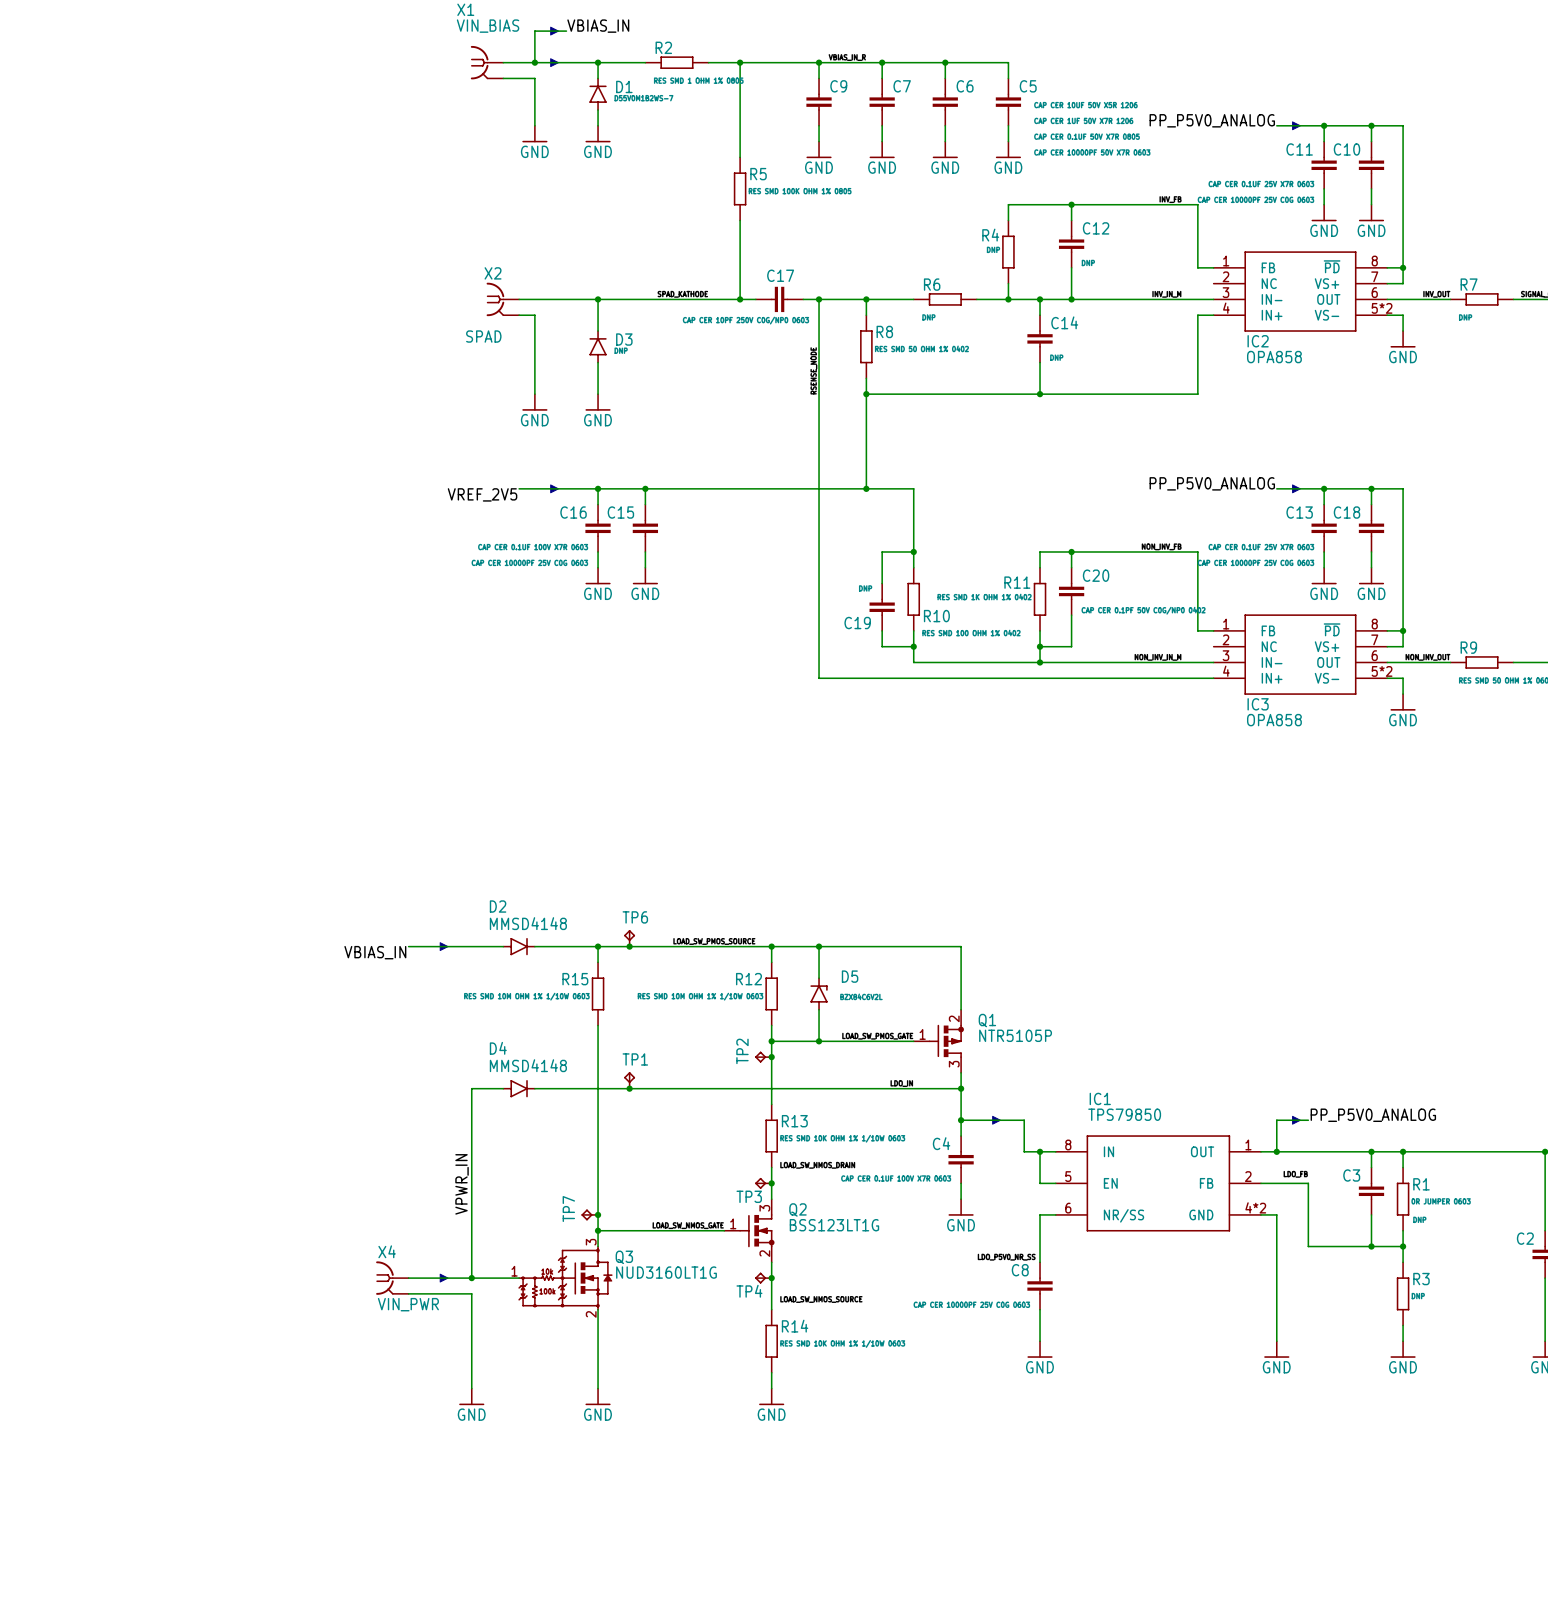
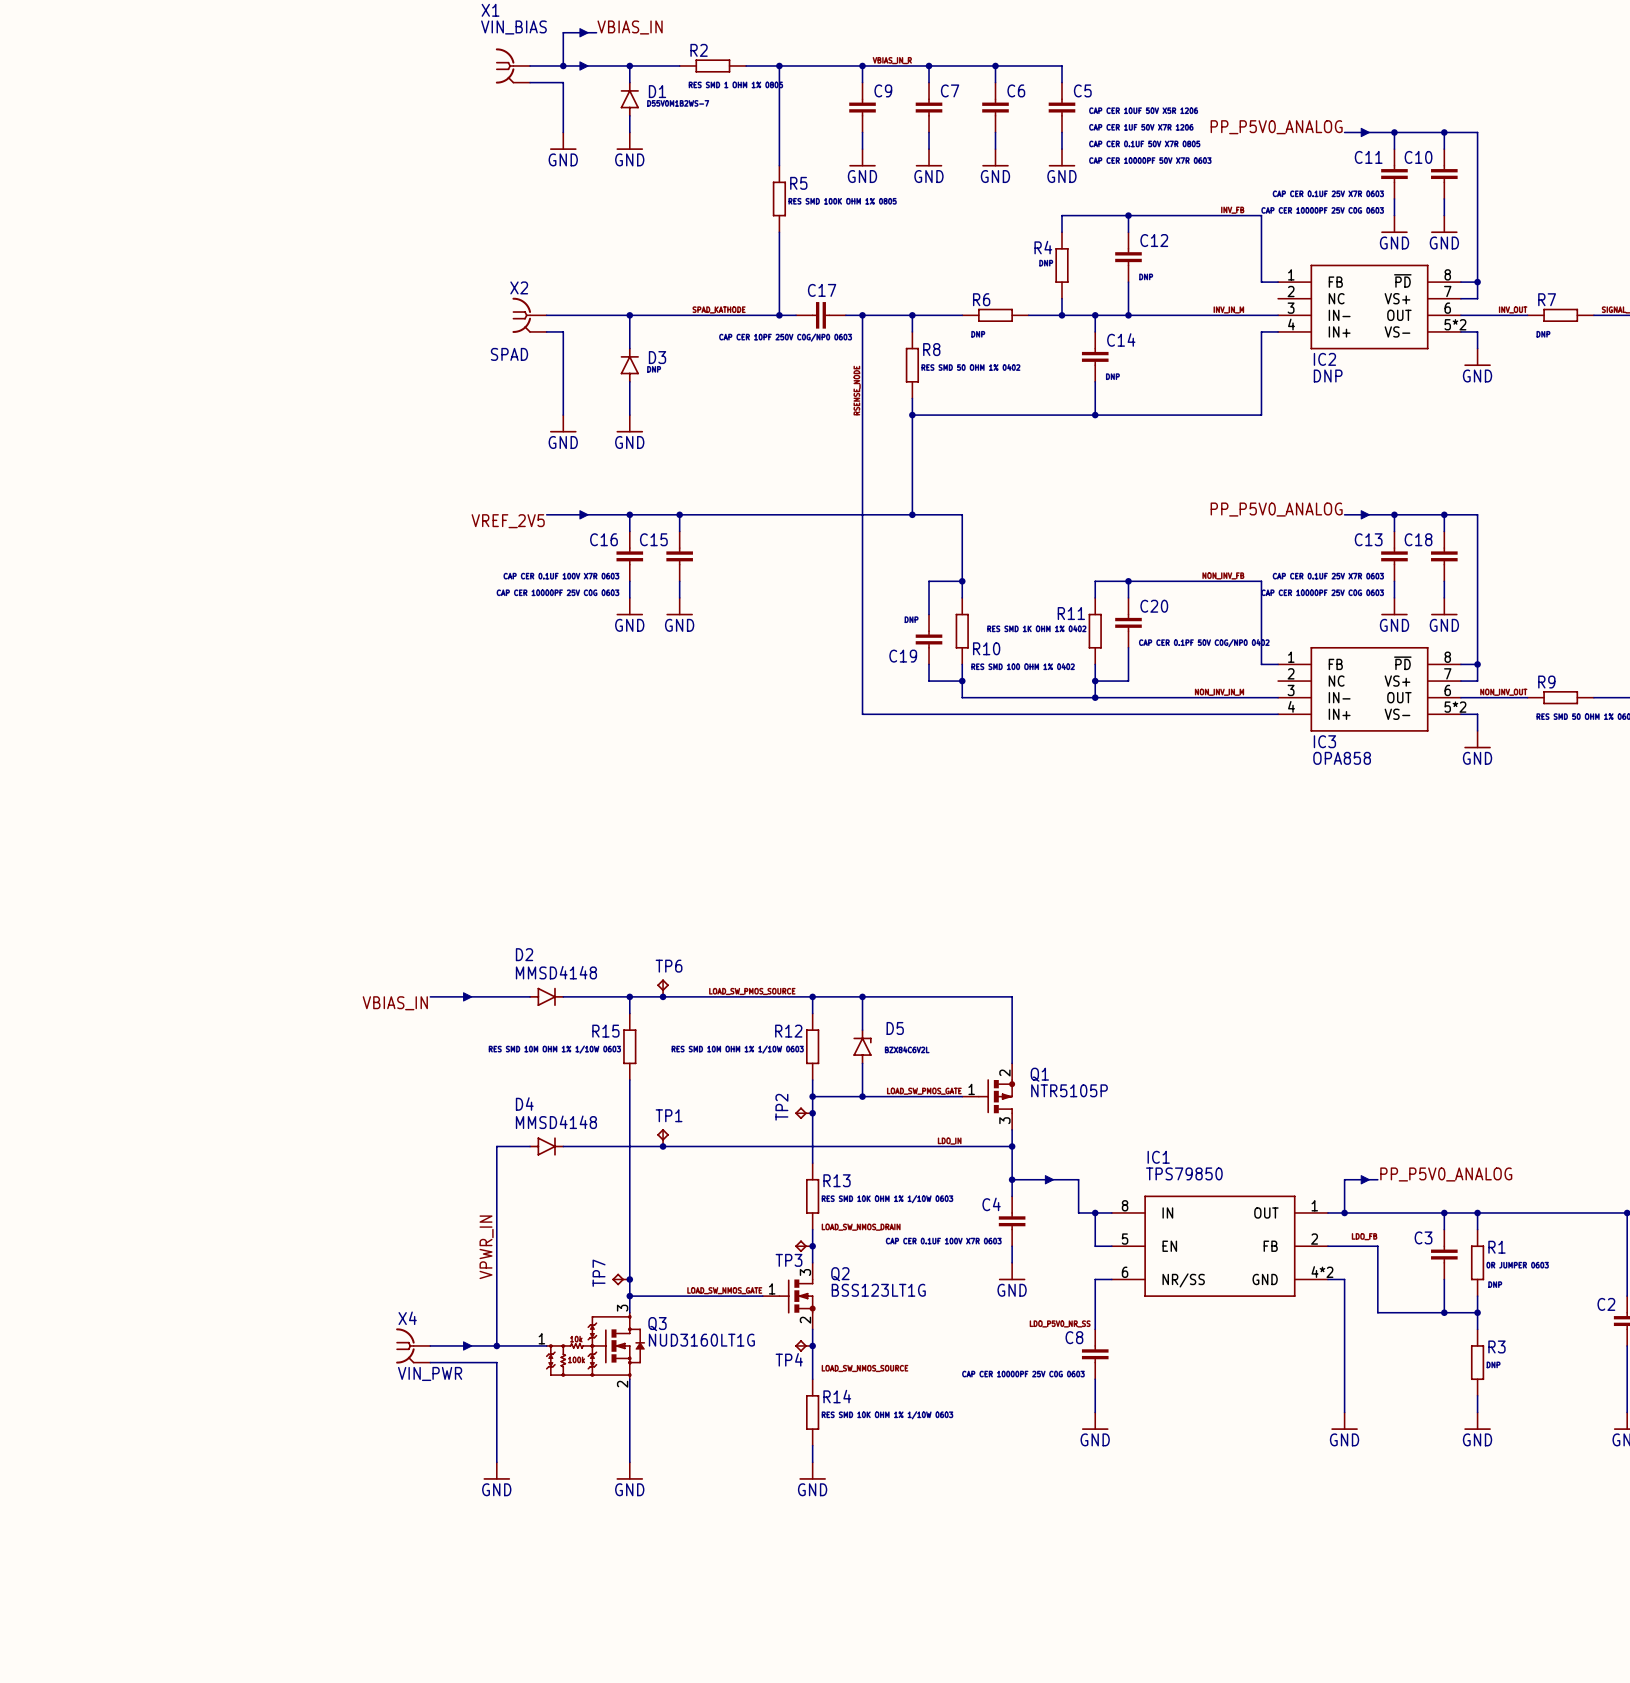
IC2 value: OPA858 (1274, 357) -> DNP (1328, 376)

